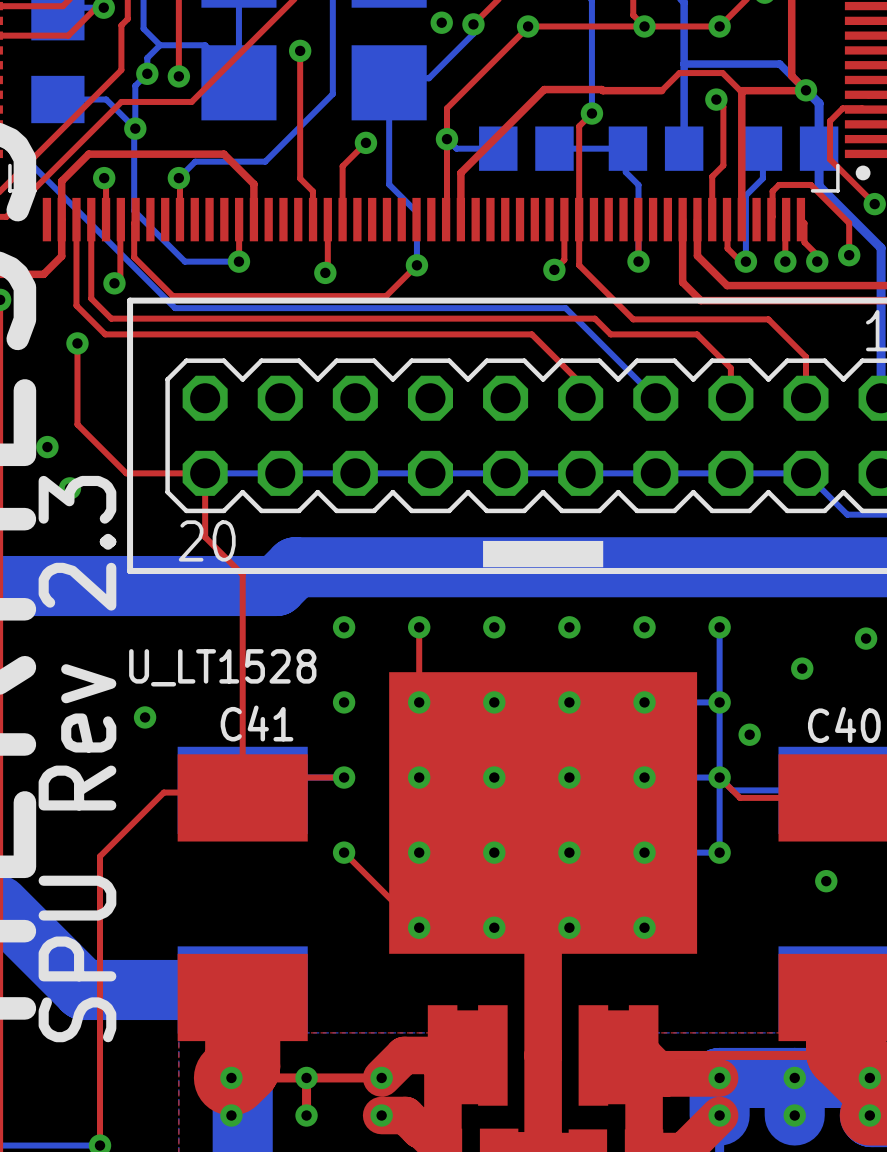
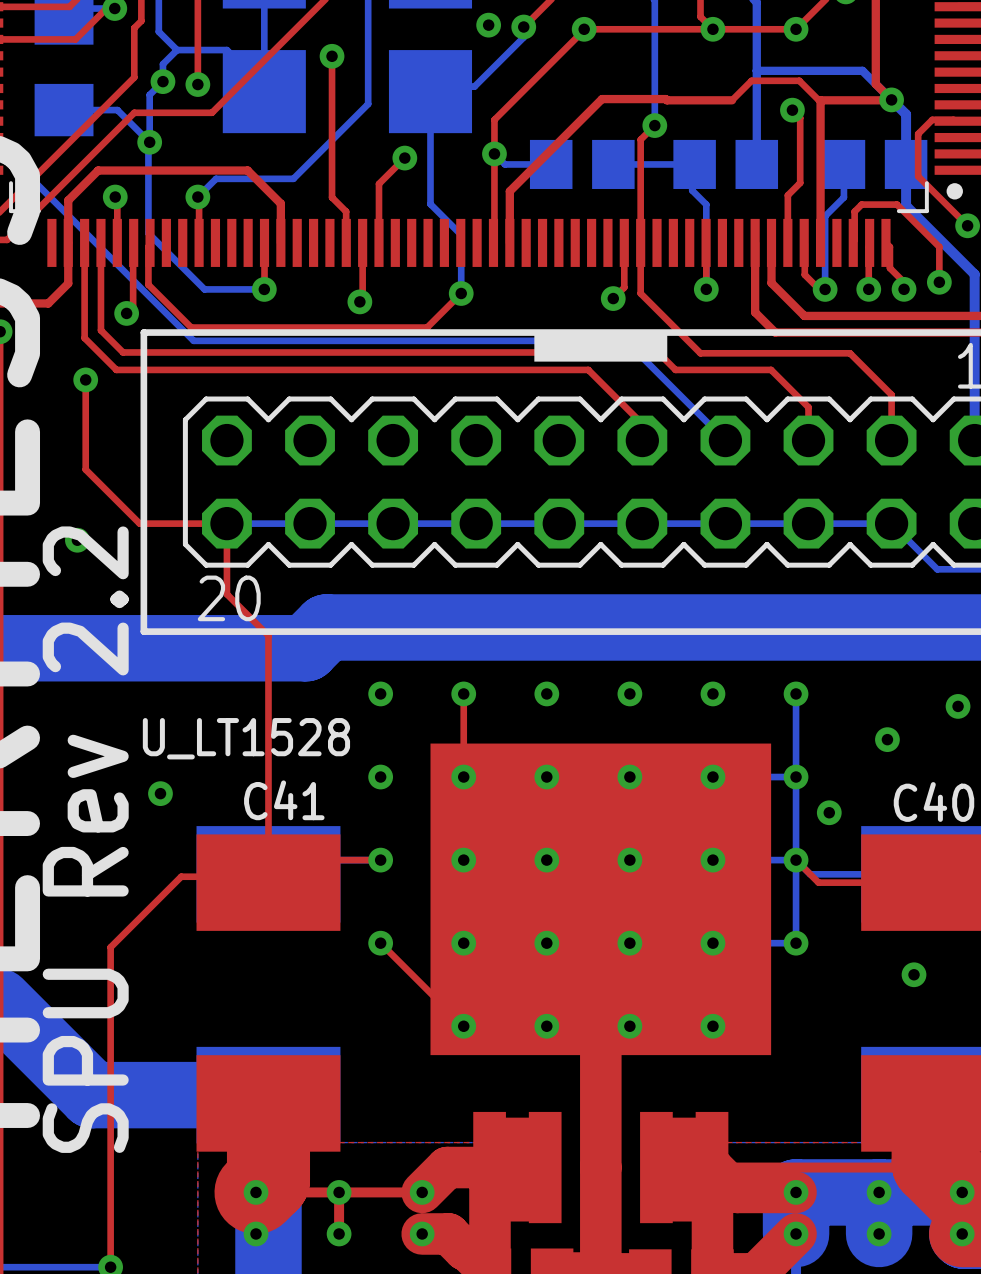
via: (47, 447) -> none
drawing position: (543, 554) -> (600, 347)
text: SPU Rev 2.3 (77, 759) -> SPU Rev 2.2 (85, 839)

